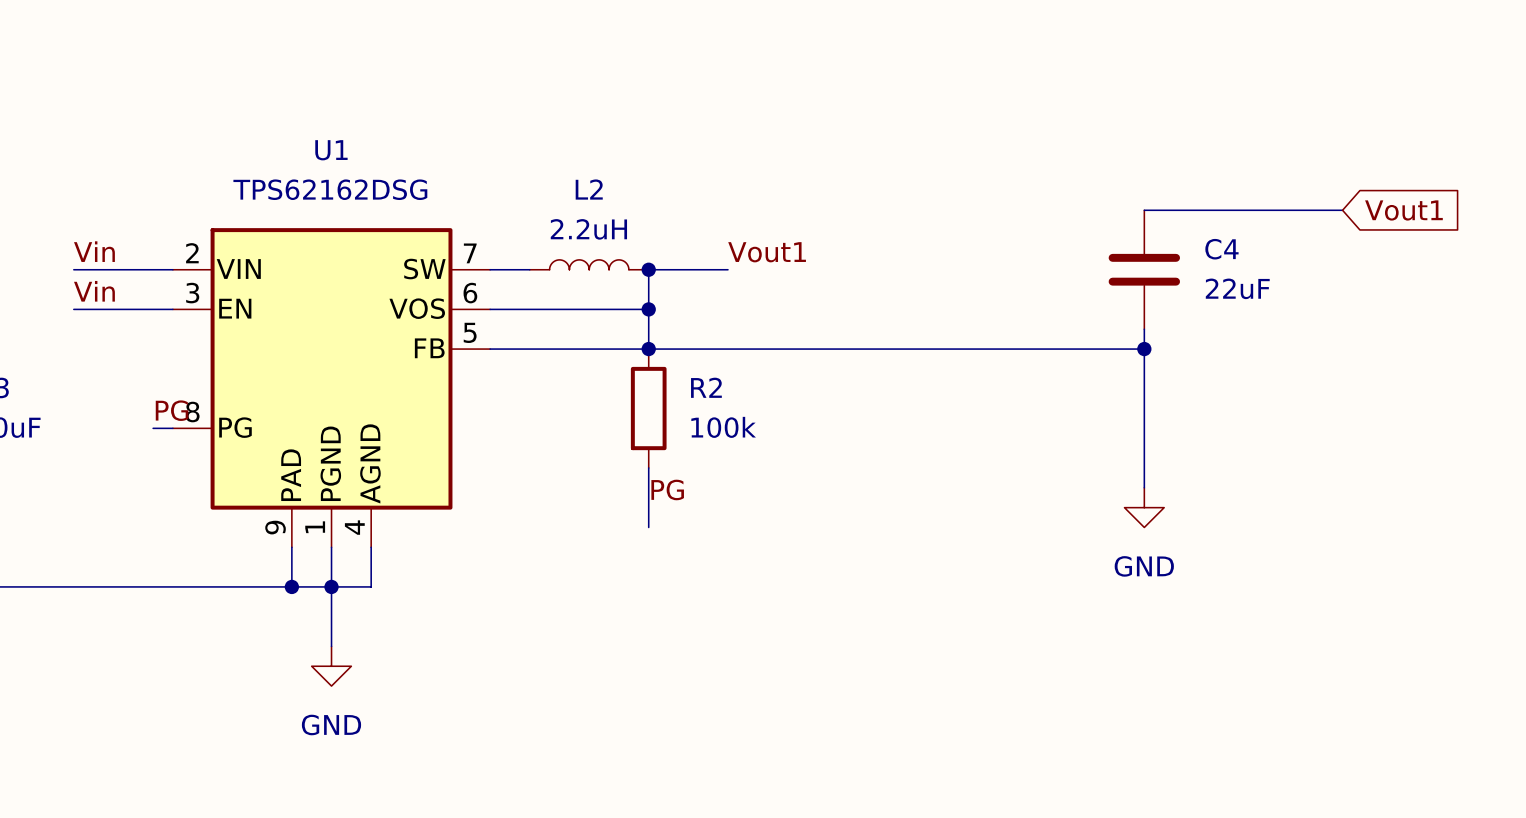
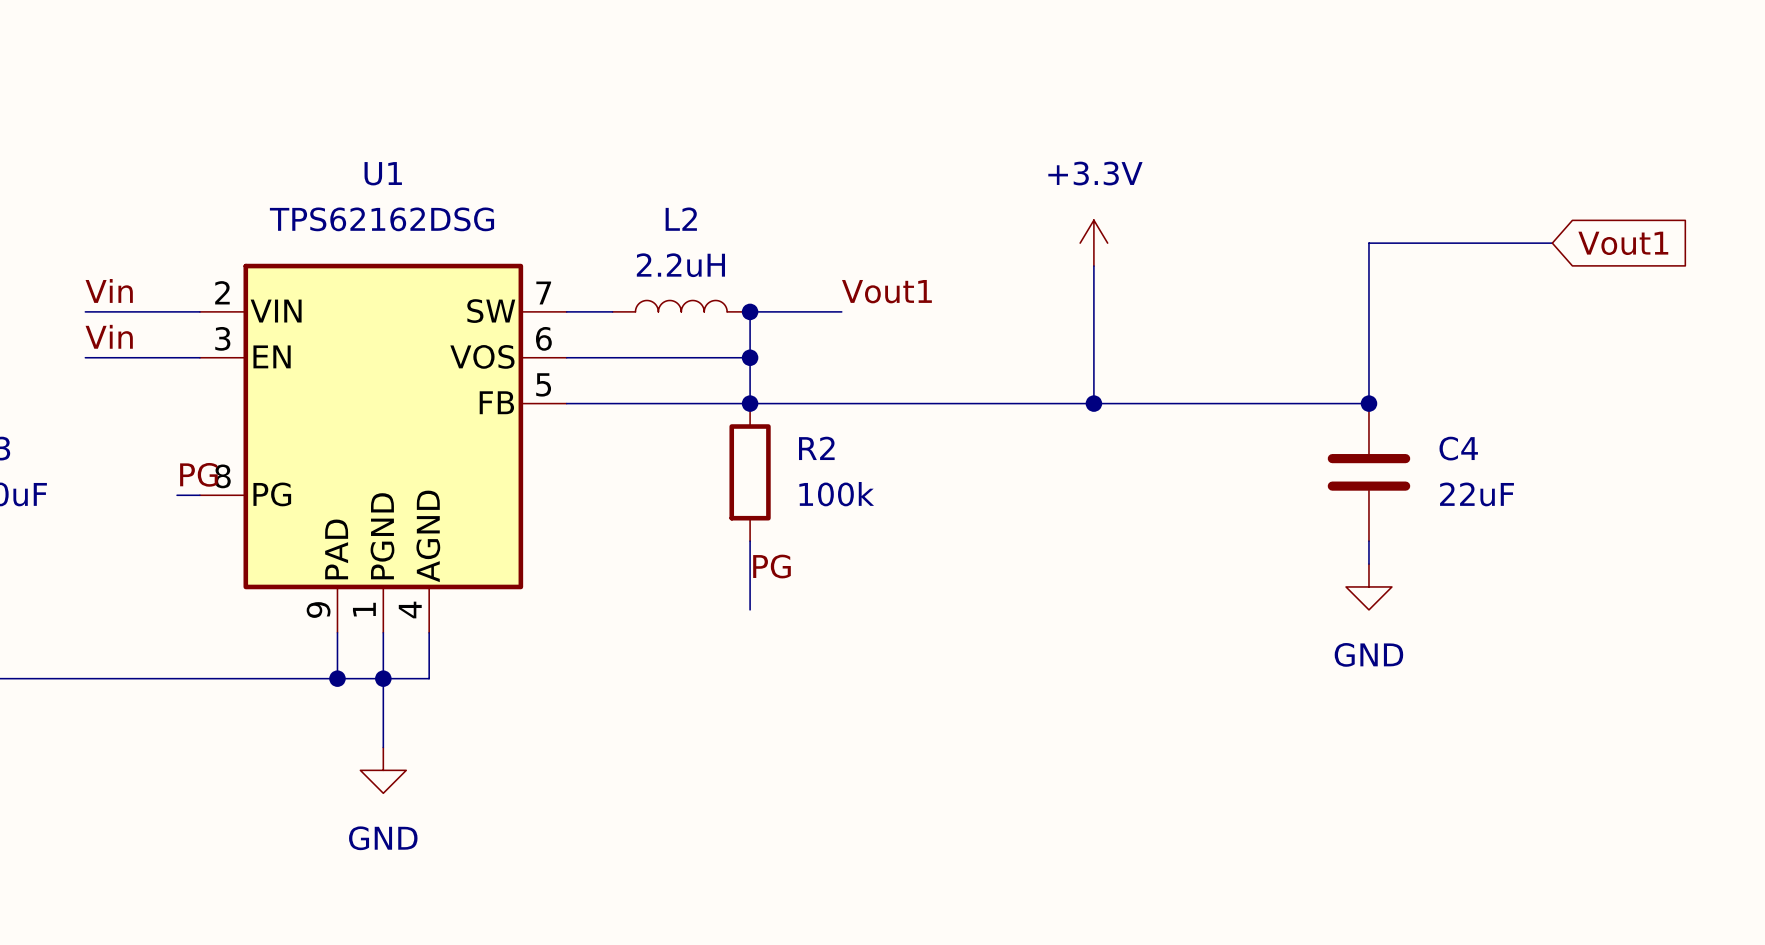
power symbol: none -> +3.3V (1093, 243)
wire: (1144, 210) (1183, 210) -> (1323, 403) (1368, 403) (1368, 243)
wire: none -> (1093, 266) (1093, 403)
C4 position: (1144, 269) -> (1368, 472)
wire: (1144, 329) (1144, 487) -> none
junction: none -> (1093, 403)
junction position: (1144, 349) -> (1368, 403)
wire: none -> (1368, 541) (1368, 564)
power symbol position: GND (1144, 507) -> GND (1368, 586)

